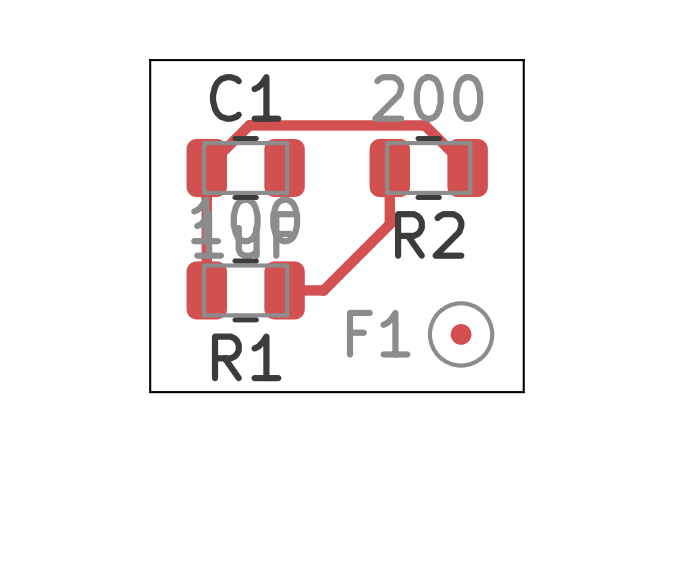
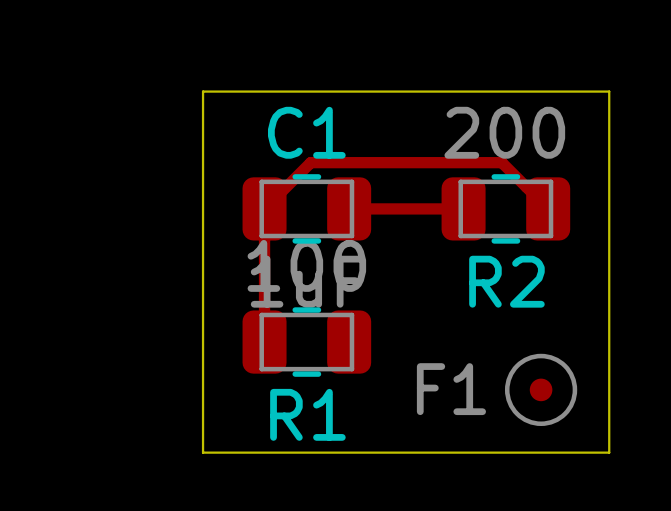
top track: (389, 167) (389, 224) (323, 290) (284, 290) -> (463, 208) (349, 208)

